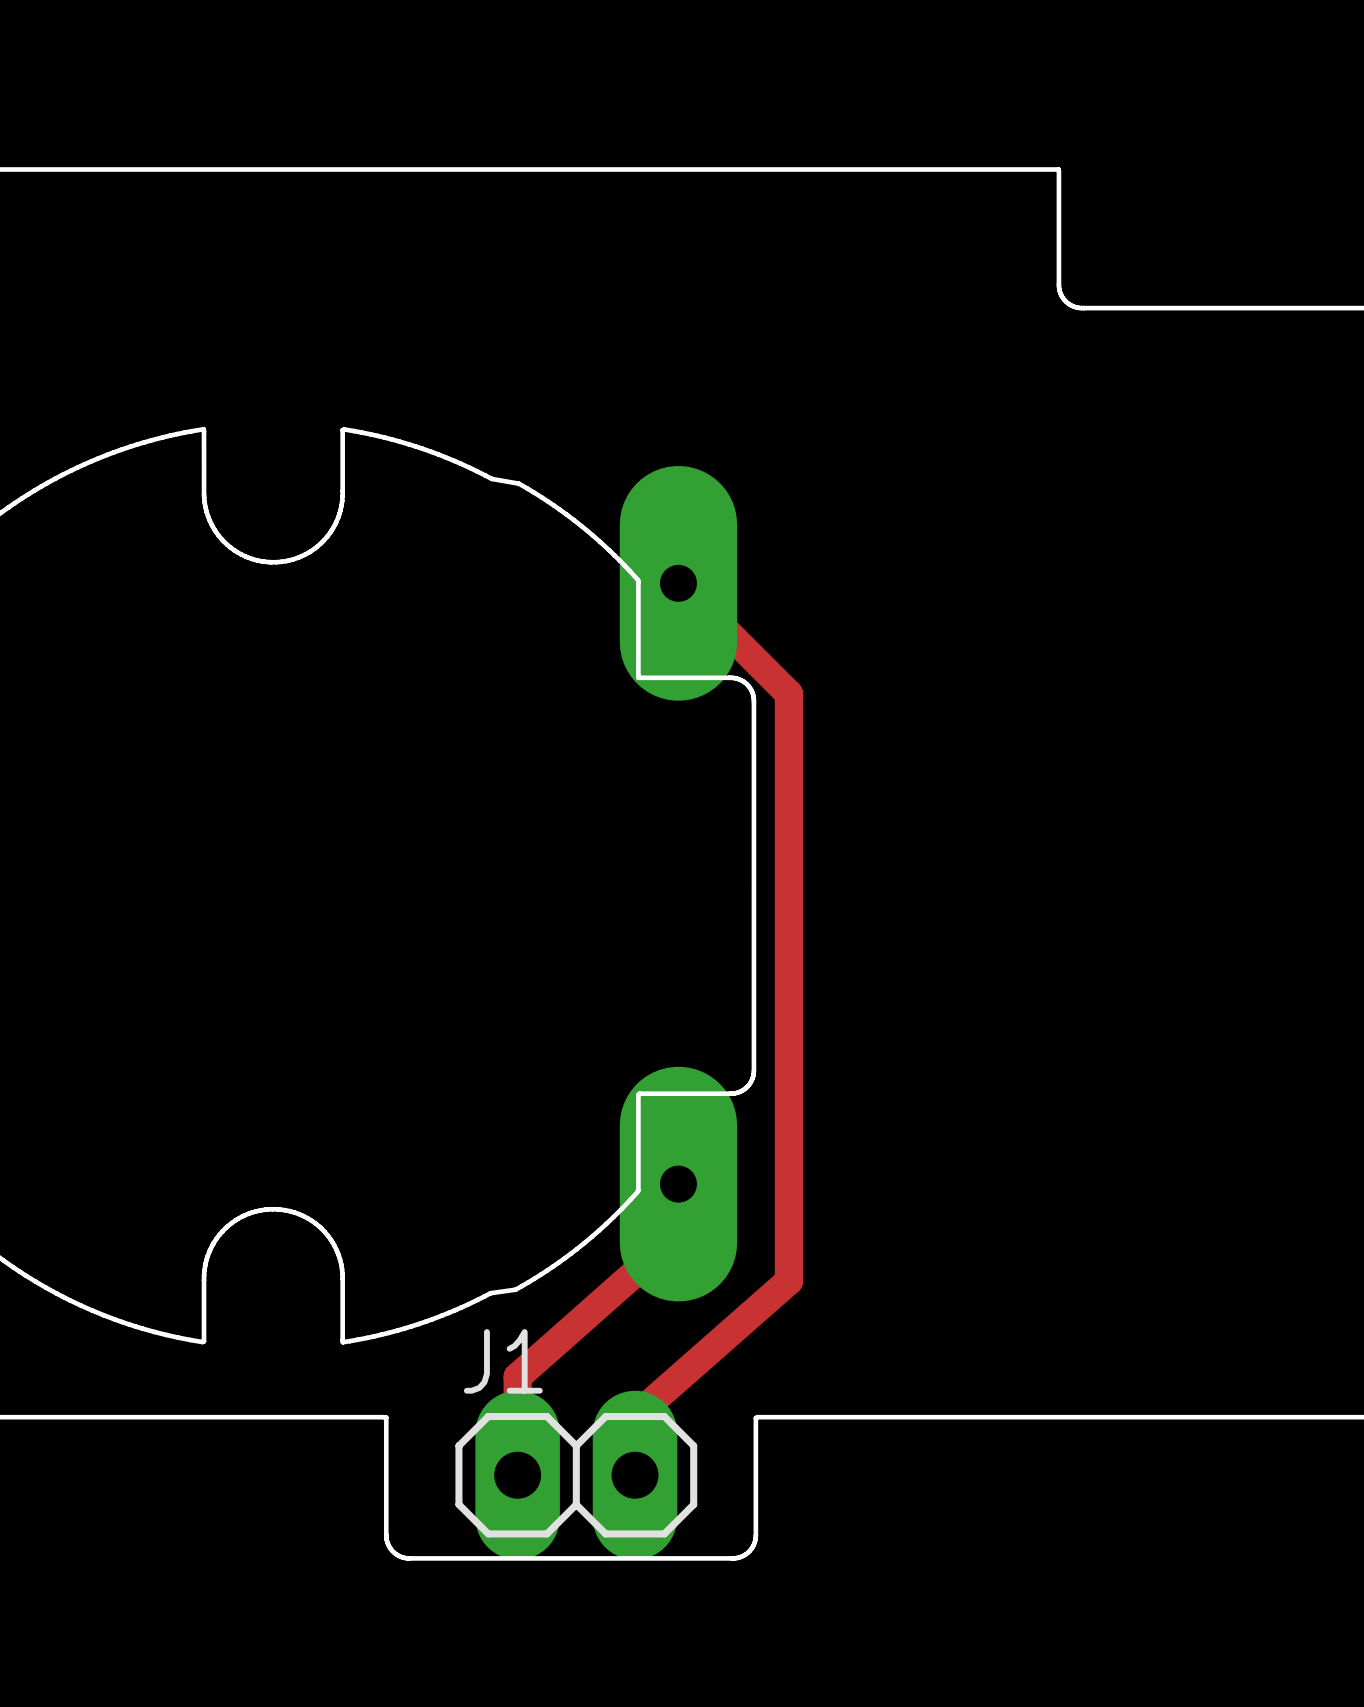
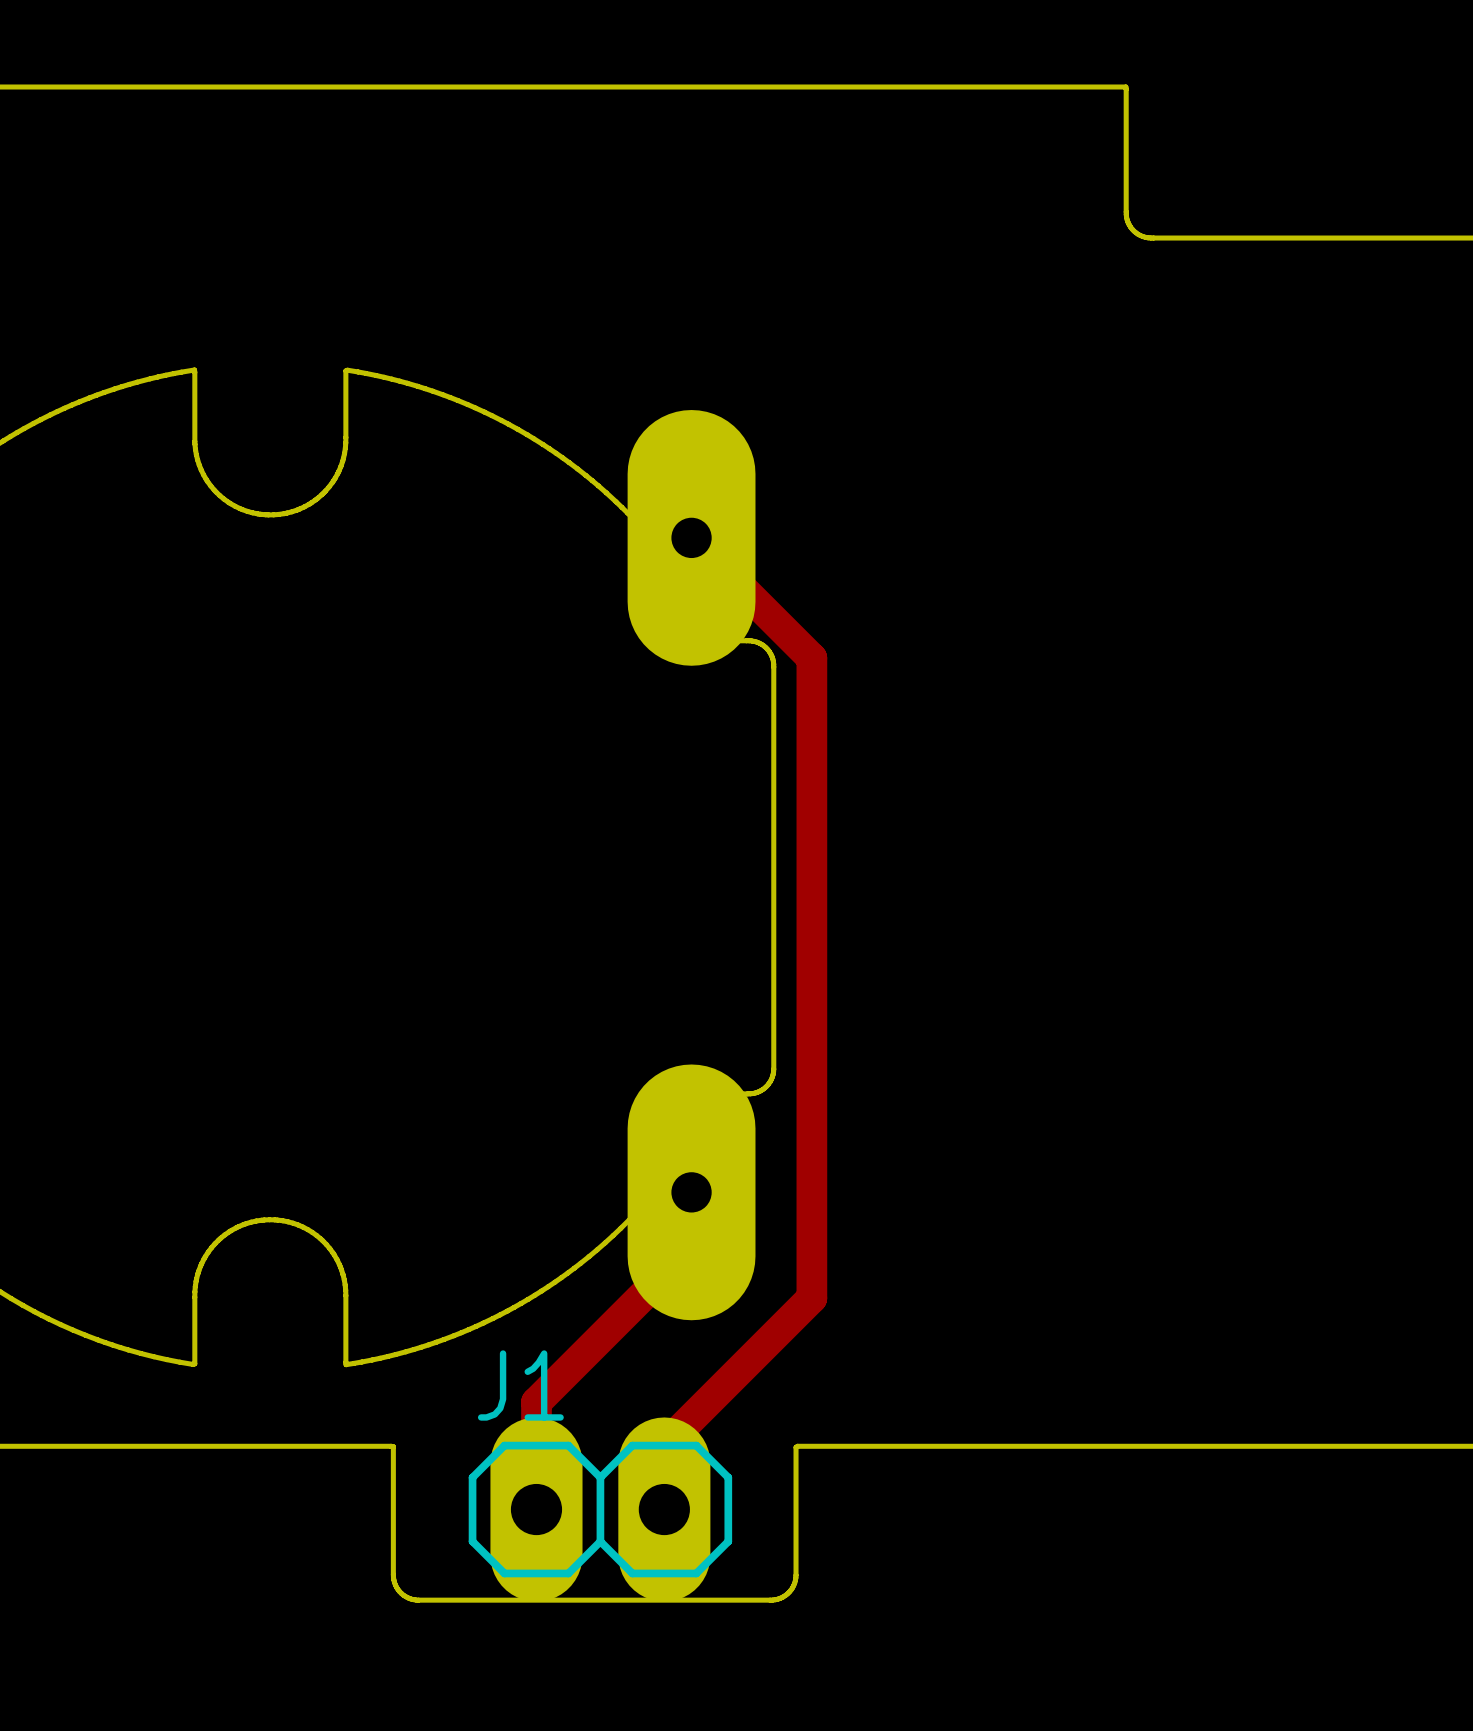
board edge: (491, 478) (518, 483) (554, 505) (600, 542) (638, 580) (638, 677) -> (508, 424) (549, 448) (586, 475) (616, 501) (647, 534) (647, 640) (668, 640)
top track: (678, 583) (788, 693) (788, 1281) (635, 1416) -> (691, 537) (811, 658) (811, 1298) (664, 1445)
part position: (678, 583) -> (691, 537)
board edge: (710, 677) (733, 677) (742, 681) (751, 690) (753, 701) (753, 1073) (750, 1082) (741, 1090) (732, 1093) (711, 1093) -> (746, 640) (757, 642) (766, 647) (771, 656) (773, 666) (773, 1069) (771, 1079) (764, 1087) (758, 1092) (747, 1093)
board edge: (639, 1093) (637, 1192) (599, 1230) (553, 1266) (515, 1289) (490, 1293) -> (669, 1093) (647, 1095) (646, 1201) (613, 1235) (580, 1263) (541, 1291) (507, 1311)
top track: (677, 1184) (677, 1234) (517, 1376) -> (691, 1192) (691, 1247) (536, 1402)
part position: (678, 1184) -> (691, 1192)

